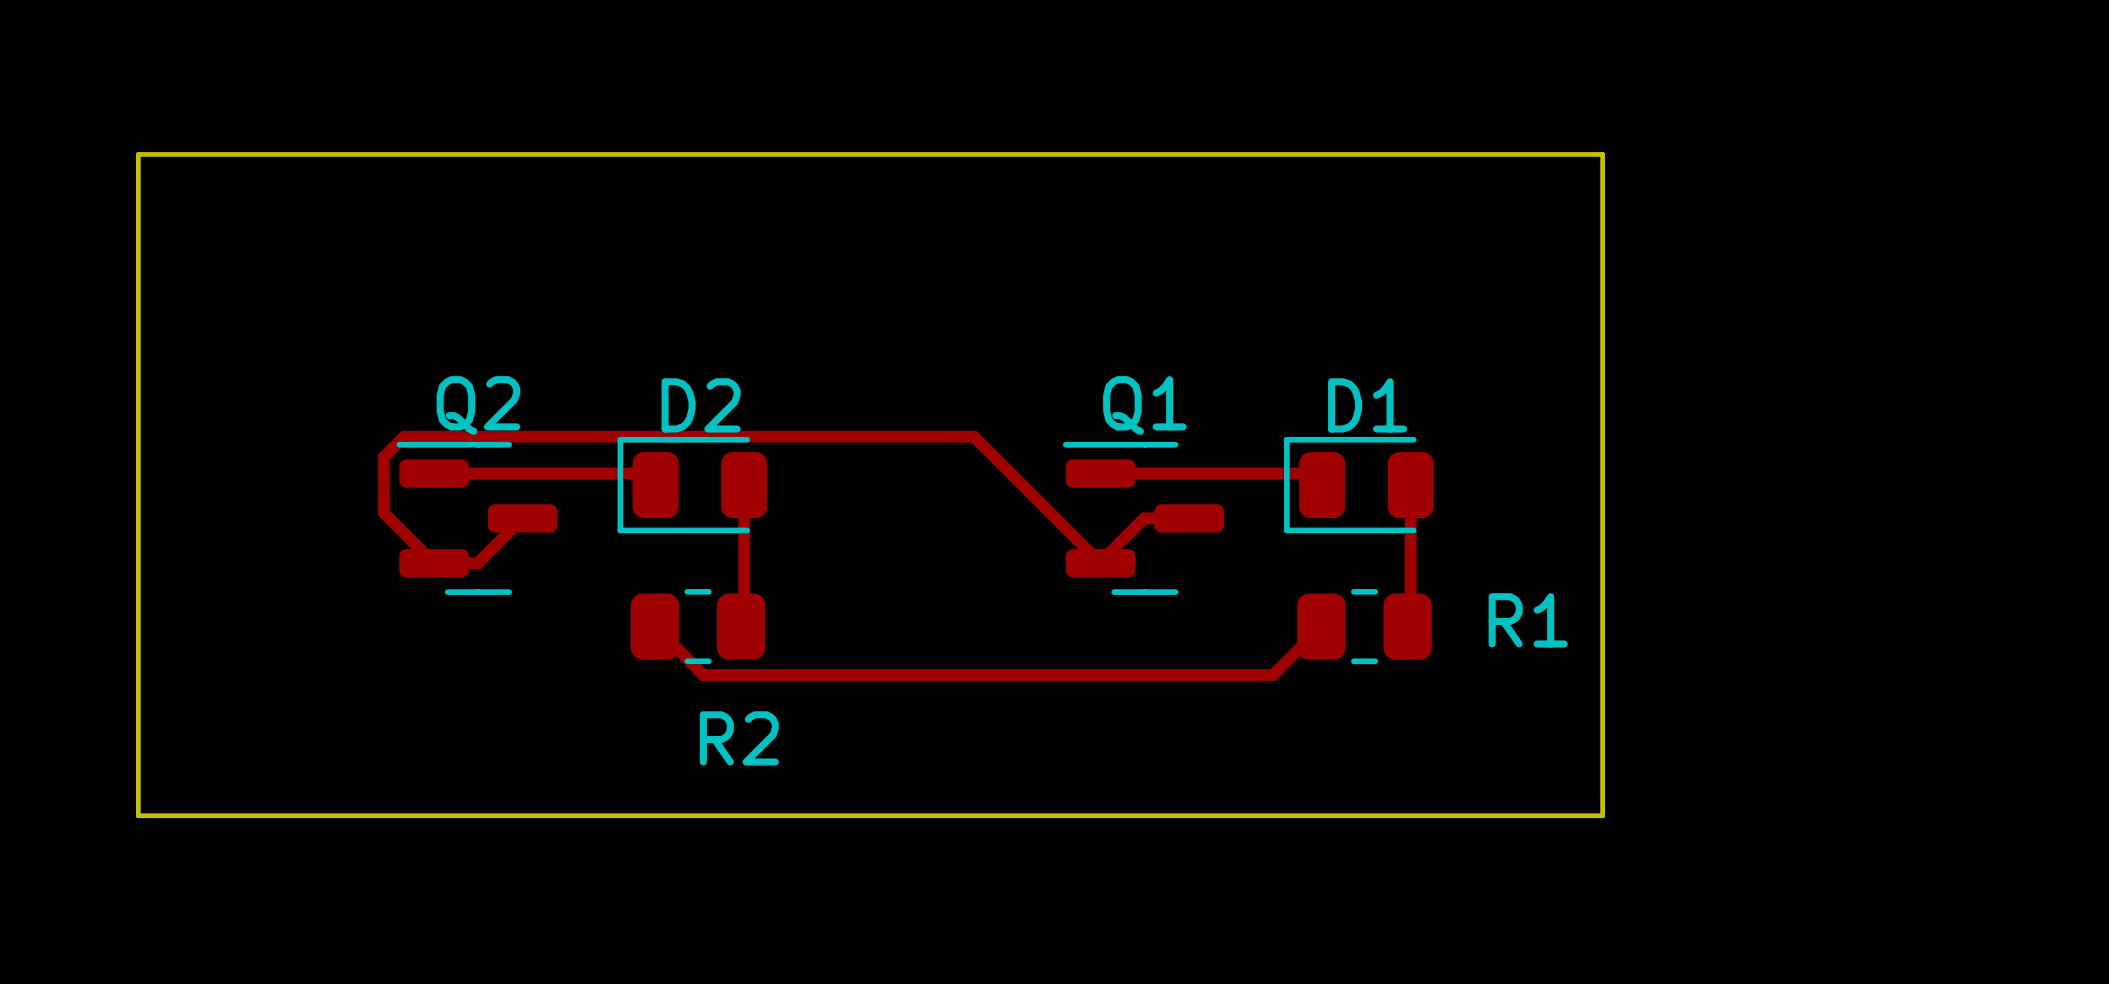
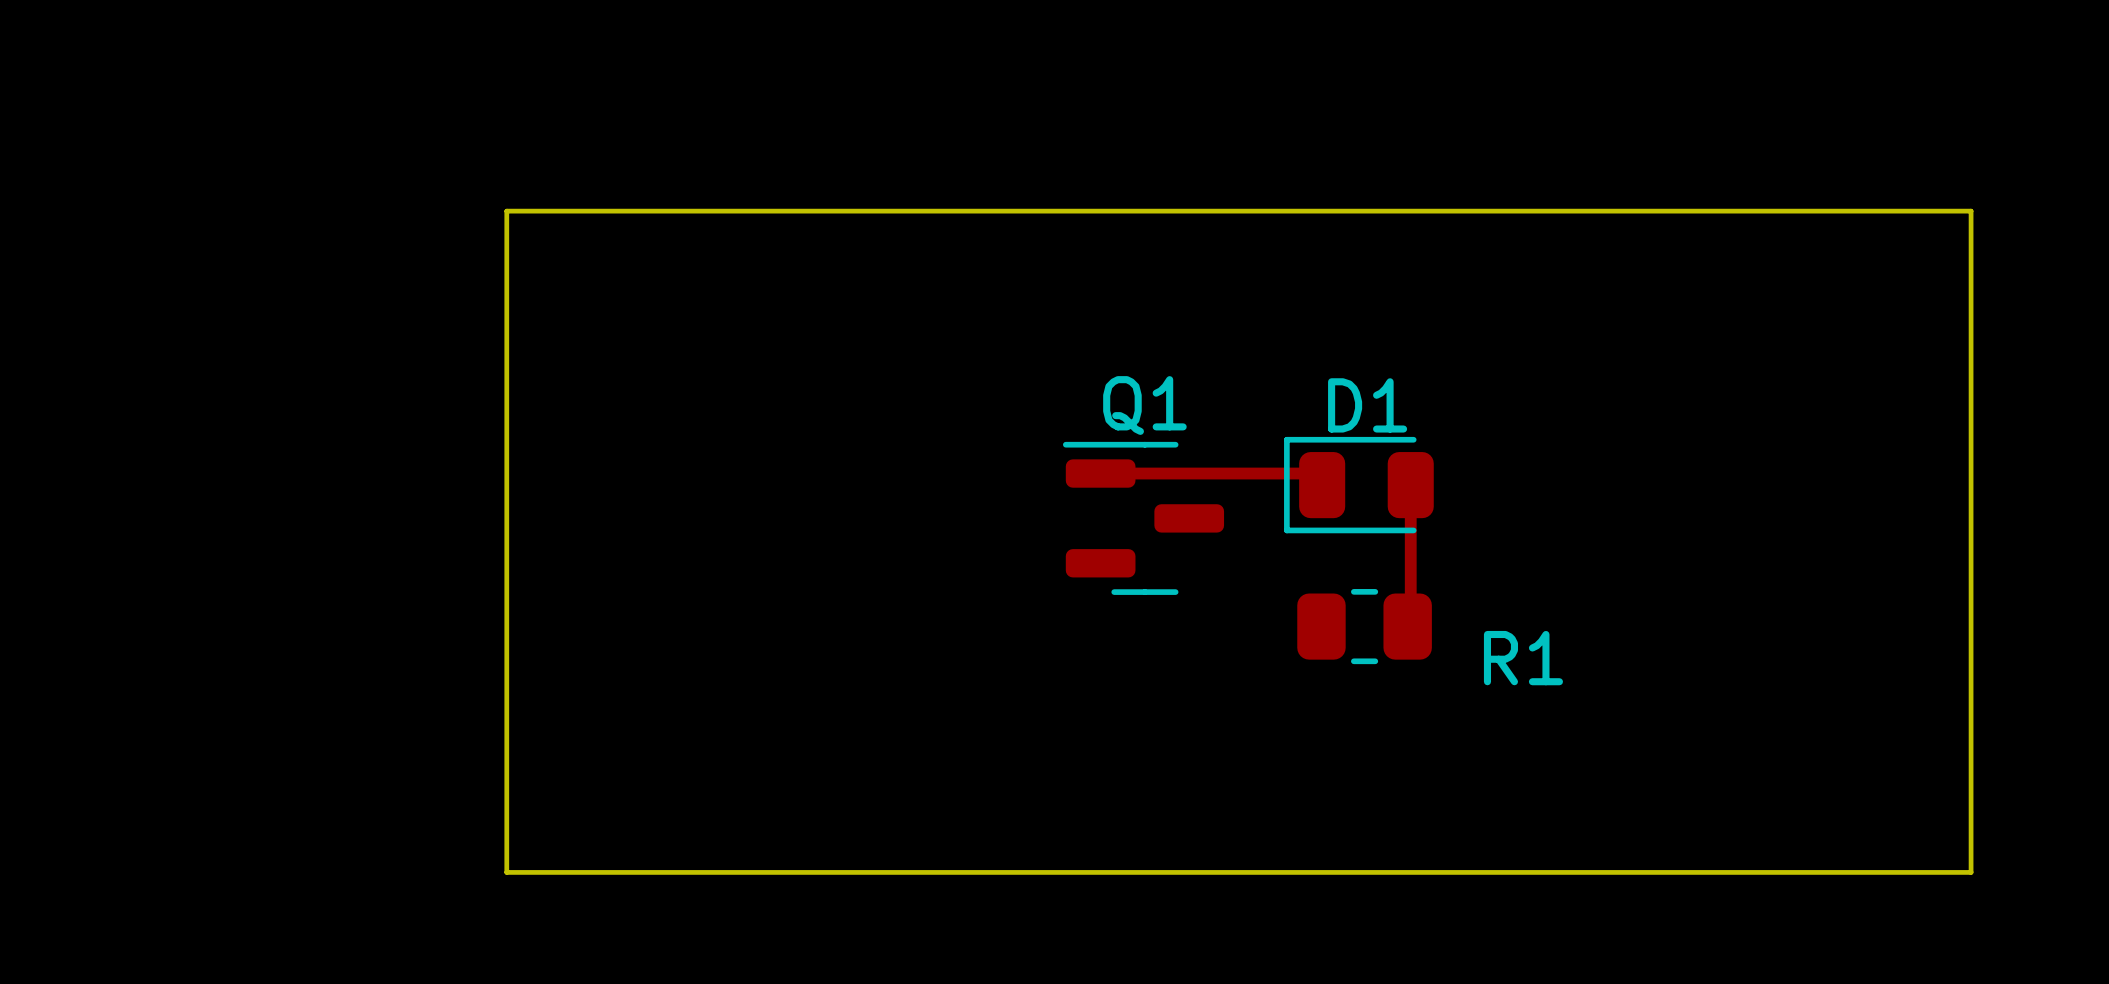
board edge: (138, 154) (1602, 154) (1602, 815) (138, 815) (138, 154) -> (506, 211) (1971, 211) (1971, 872) (506, 872) (506, 211)
track: (434, 473) (644, 473) (655, 485) -> none
D2: (692, 485) -> none
track: (744, 485) (744, 623) (741, 626) -> none
Q2: (477, 518) -> none
track: (522, 518) (477, 563) (434, 563) (383, 513) (383, 457) (404, 436) (974, 436) (1100, 563) (1144, 518) (1189, 518) -> none
R1 name position: R1 (1528, 620) -> R1 (1523, 658)
track: (654, 626) (703, 674) (1273, 674) (1321, 626) -> none
R2: (698, 626) -> none

